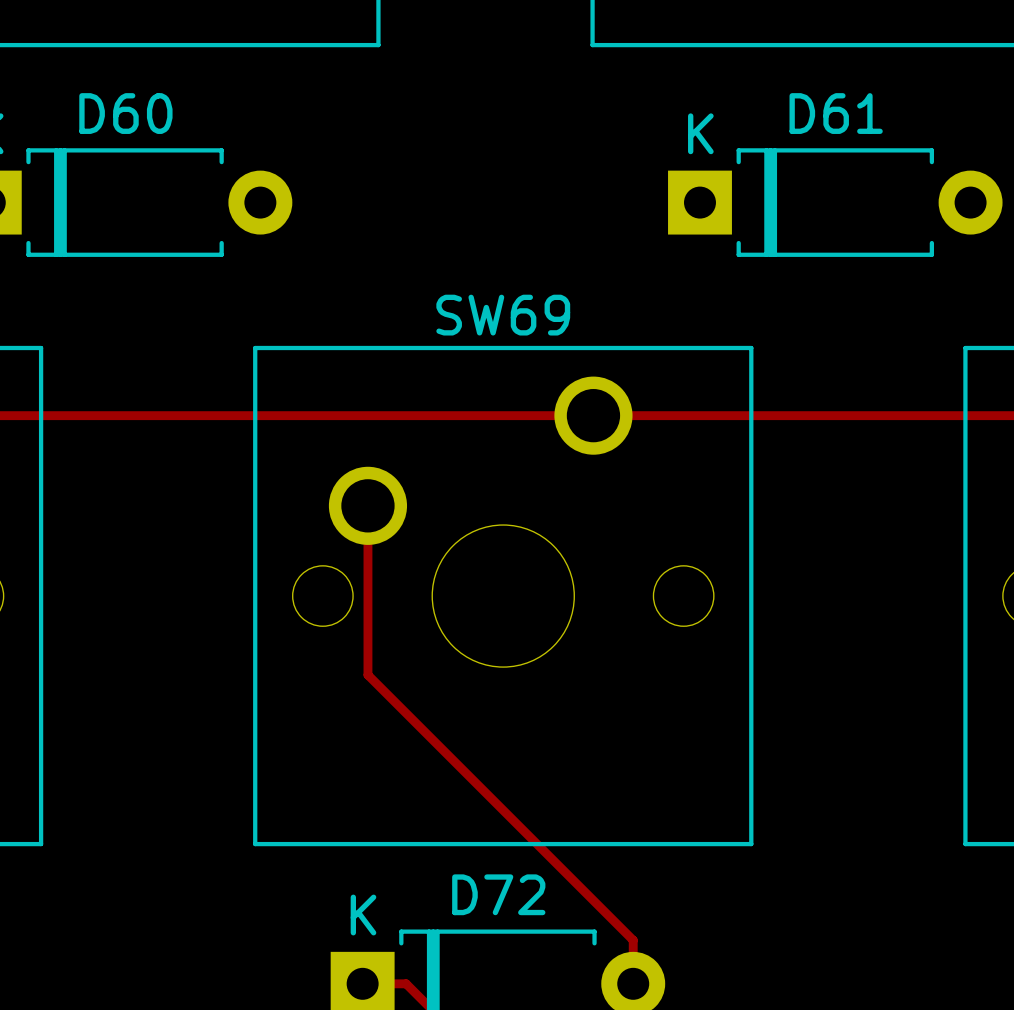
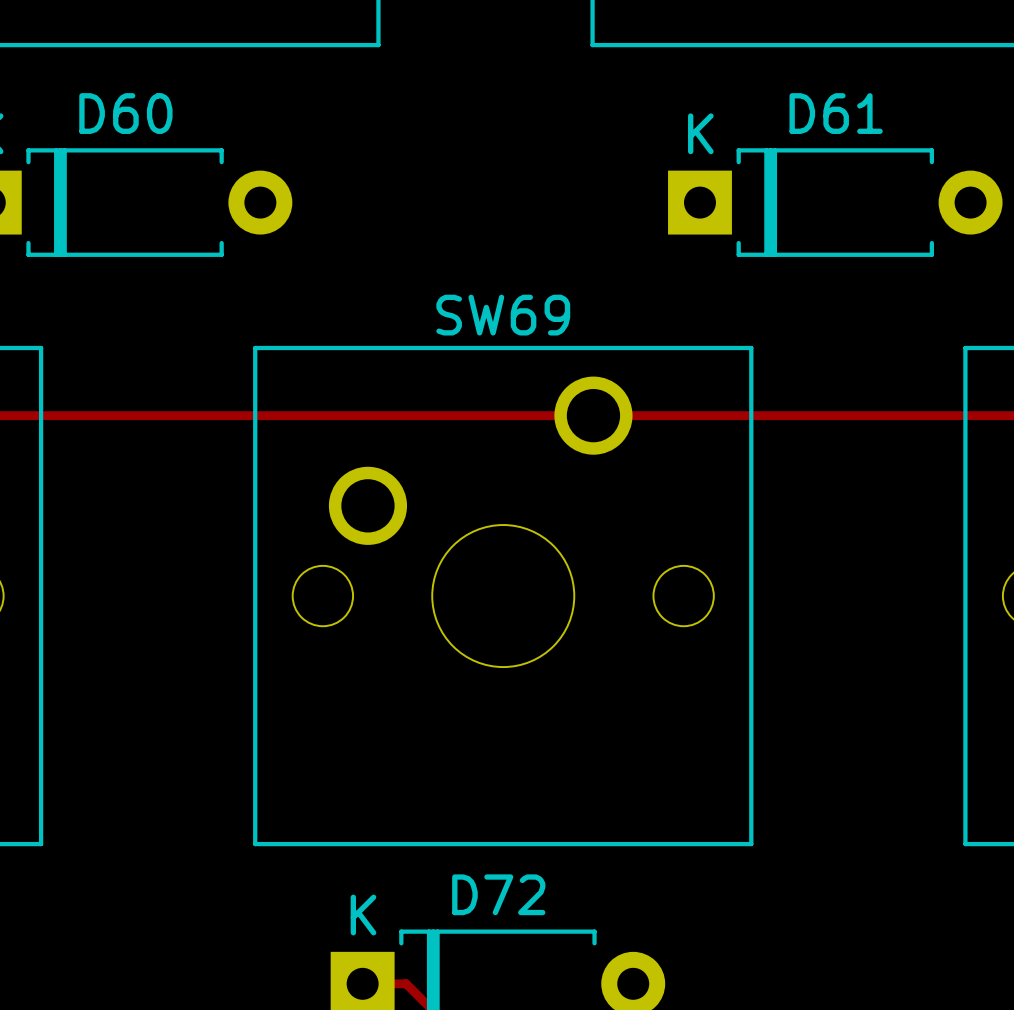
track: (367, 505) (367, 675) (633, 940) (633, 983) -> none

